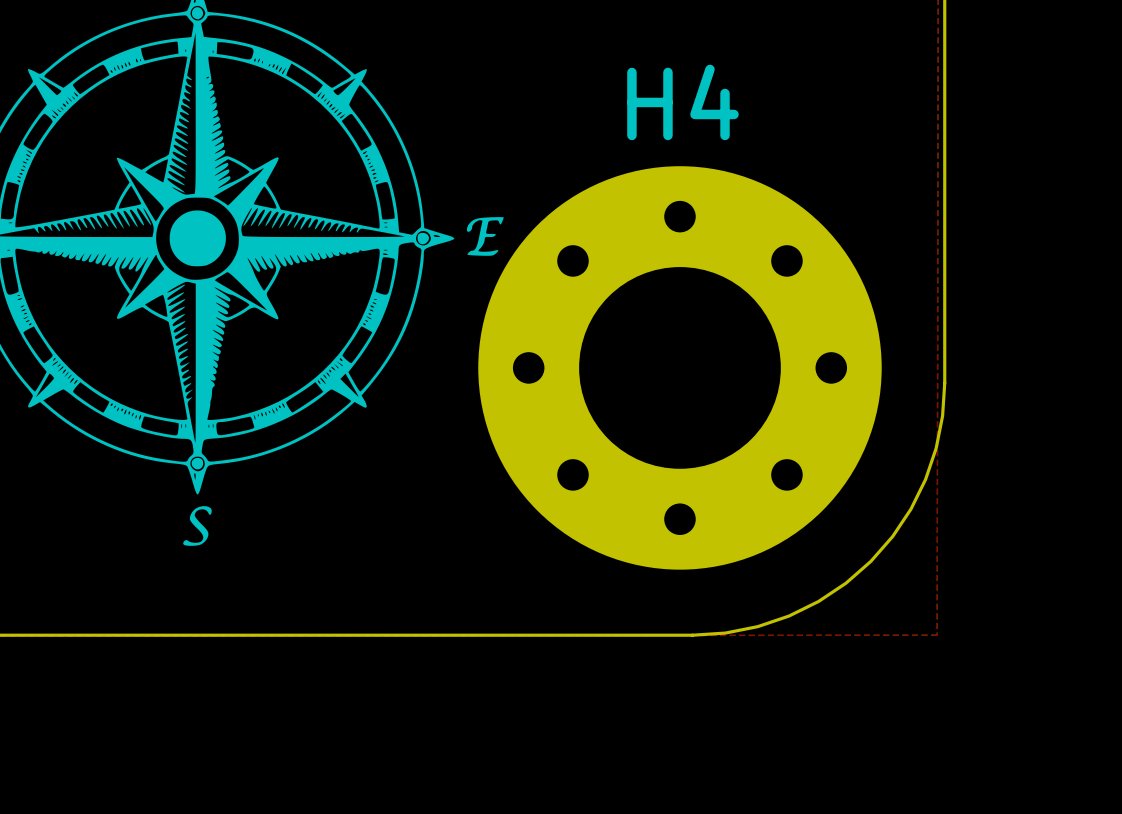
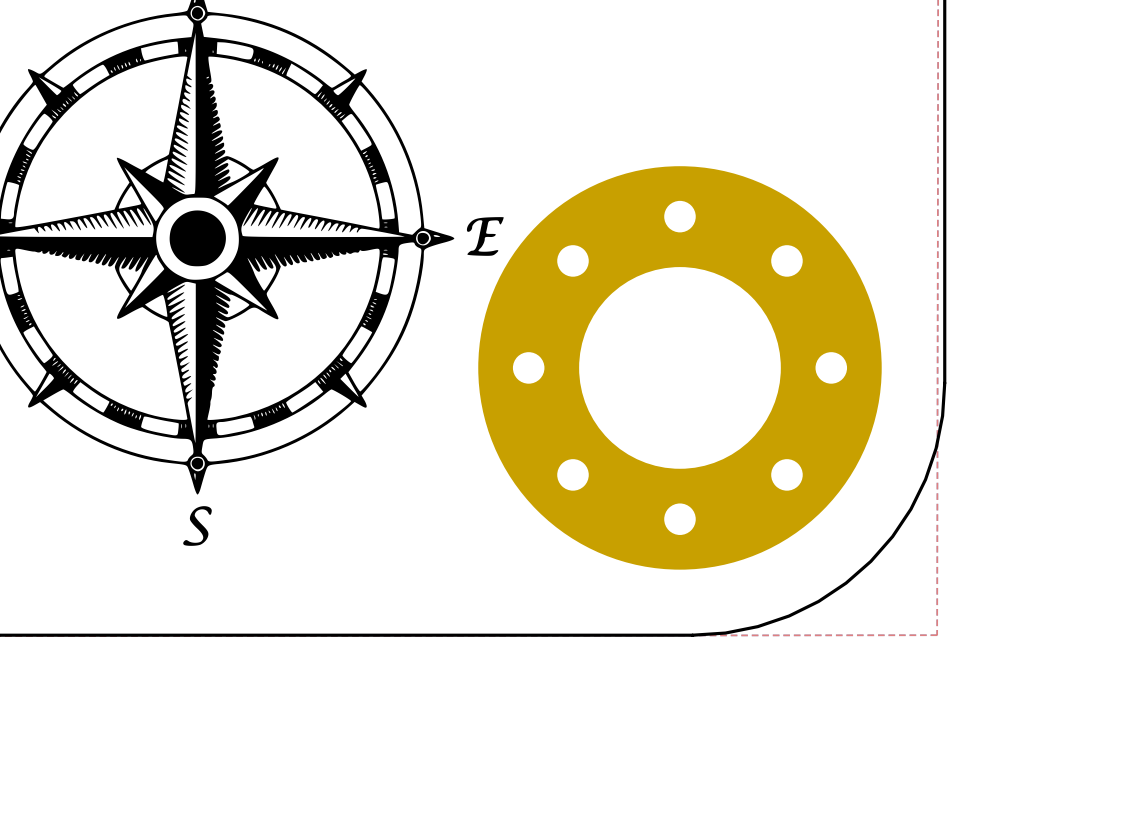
H4 name: H4 (682, 102) -> none

